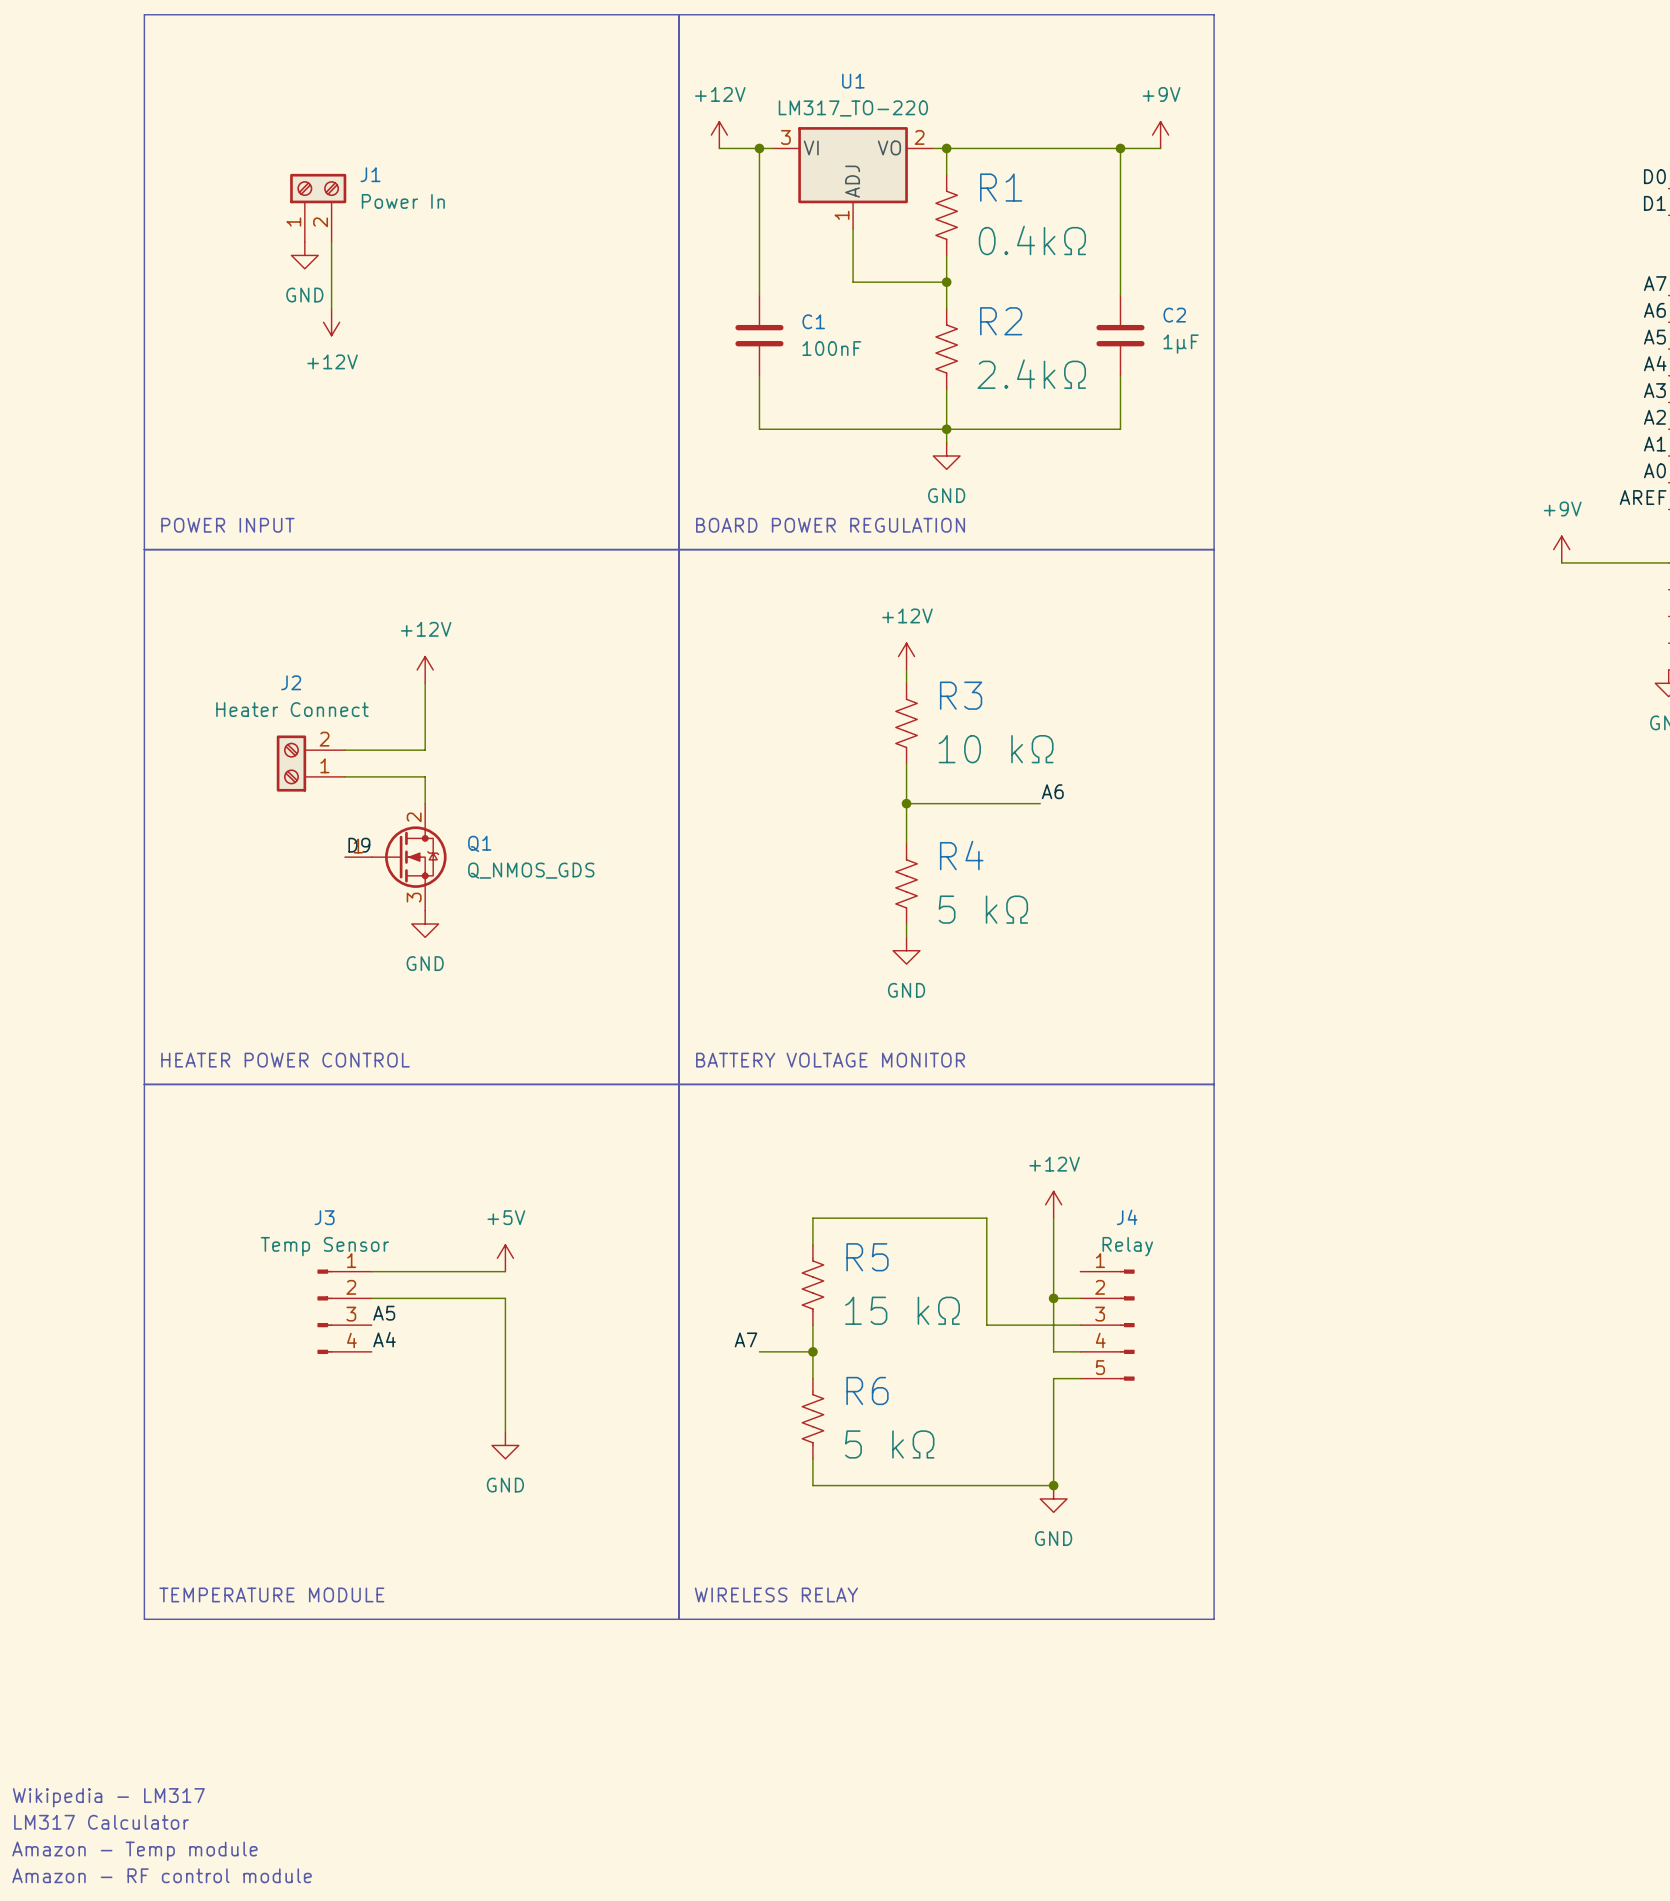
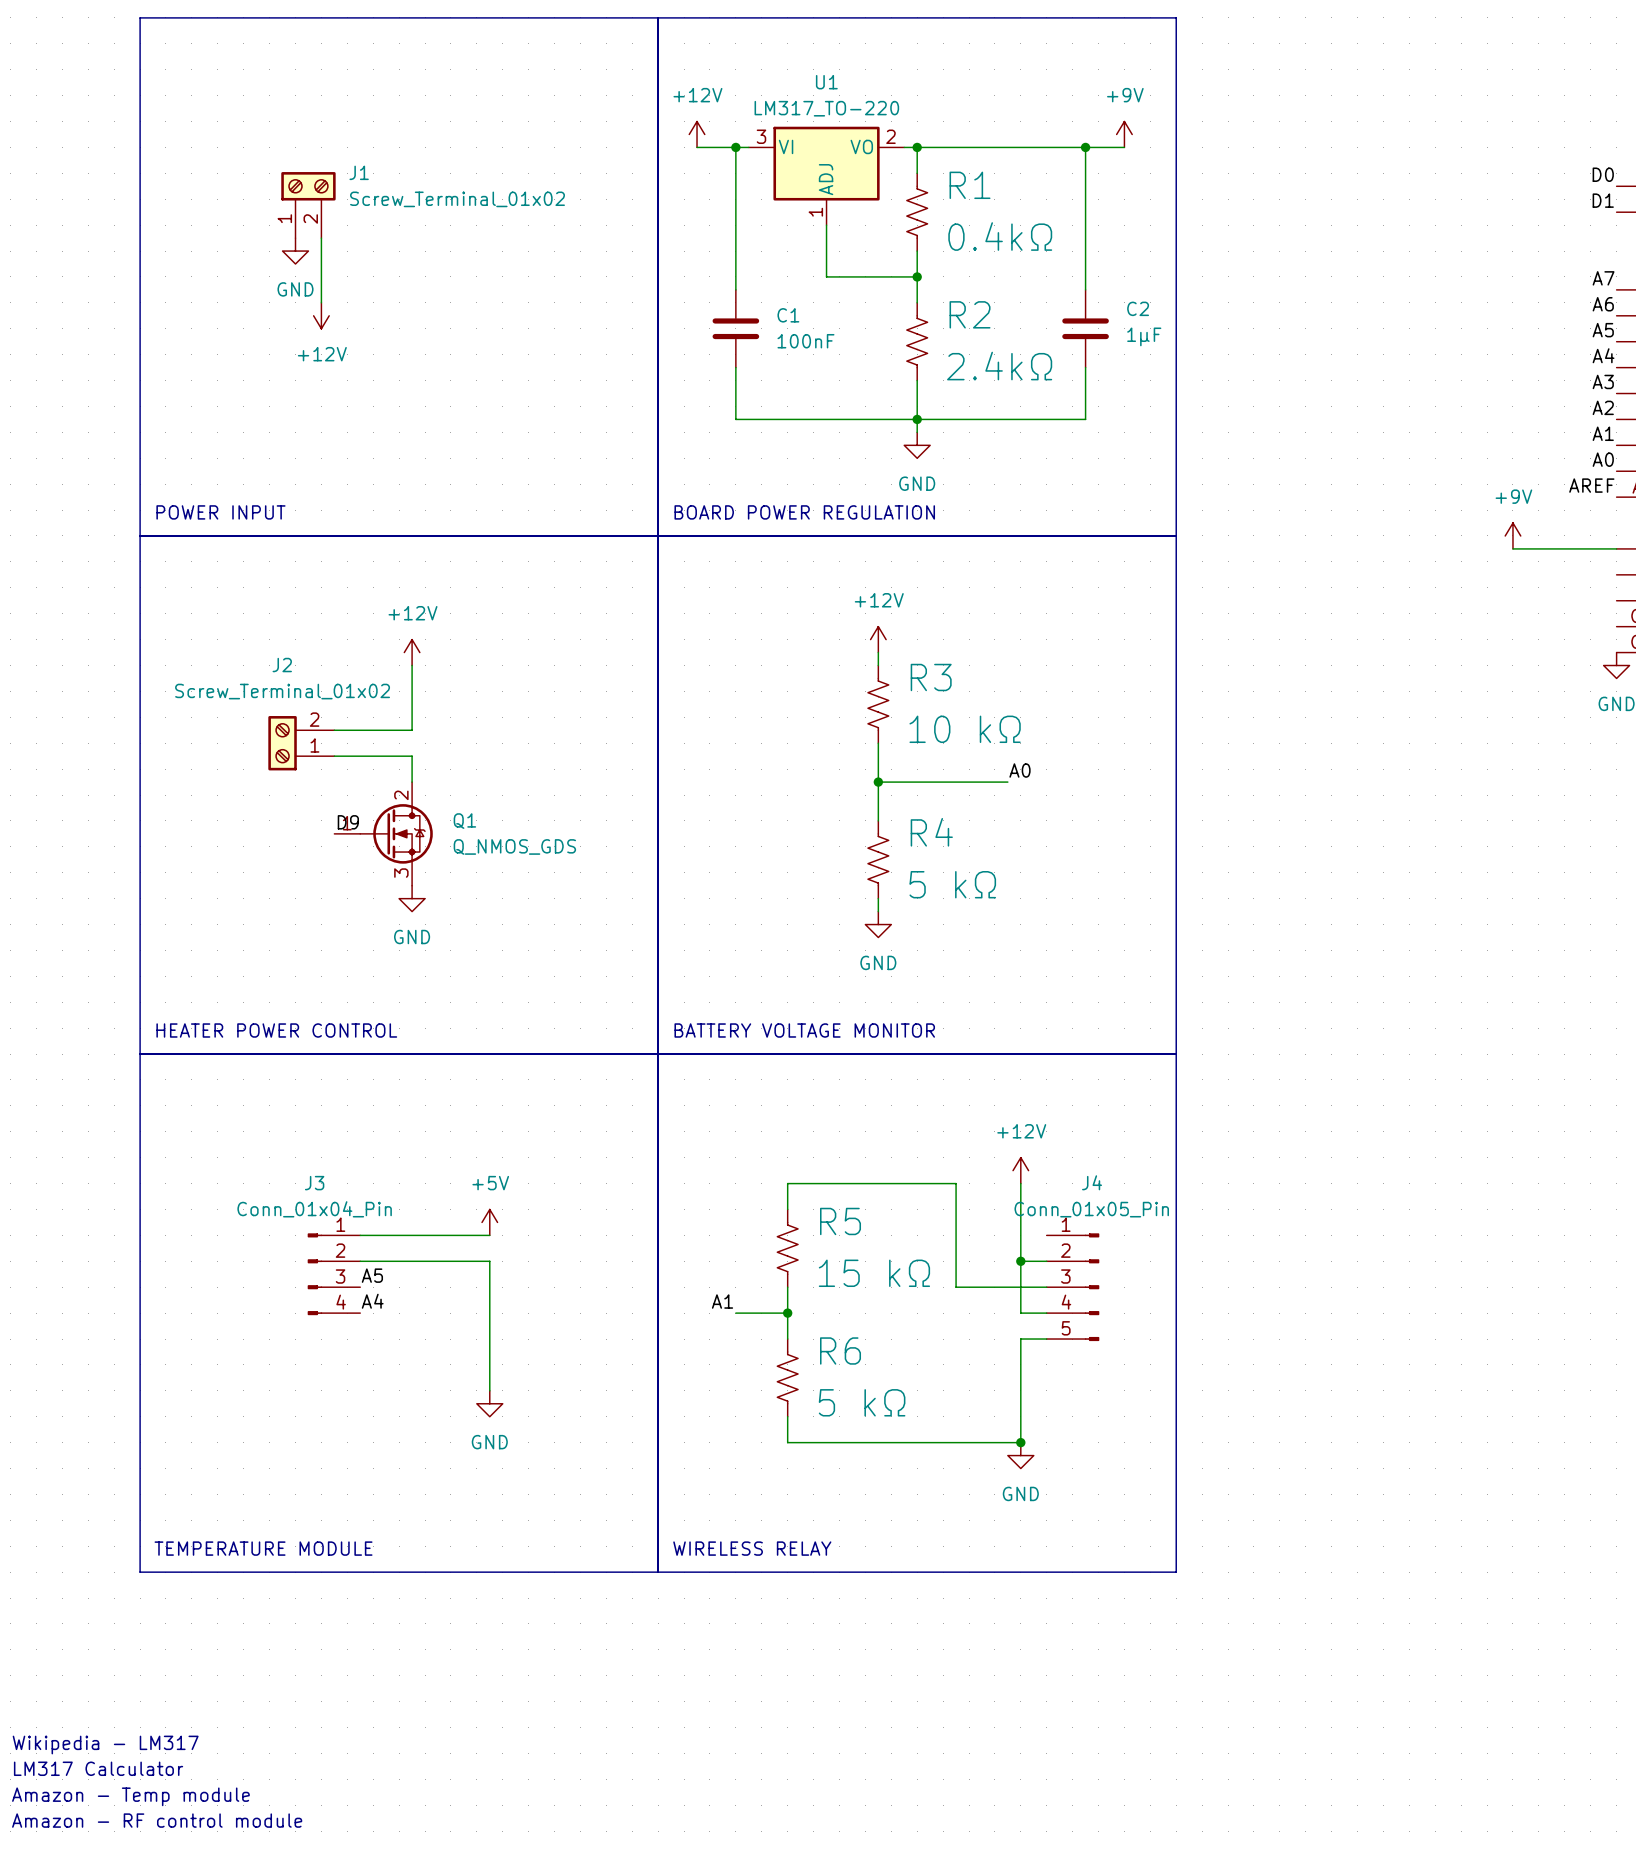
J1 value: Power In (403, 201) -> Screw_Terminal_01x02 (457, 199)
J2 value: Heater Connect (292, 709) -> Screw_Terminal_01x02 (282, 691)
label: A6 (1052, 791) -> A0 (1019, 770)
J3 value: Temp Sensor (324, 1246) -> Conn_01x04_Pin (314, 1209)
J4 value: Relay (1127, 1246) -> Conn_01x05_Pin (1091, 1209)
label: A7 (745, 1339) -> A1 (722, 1301)

